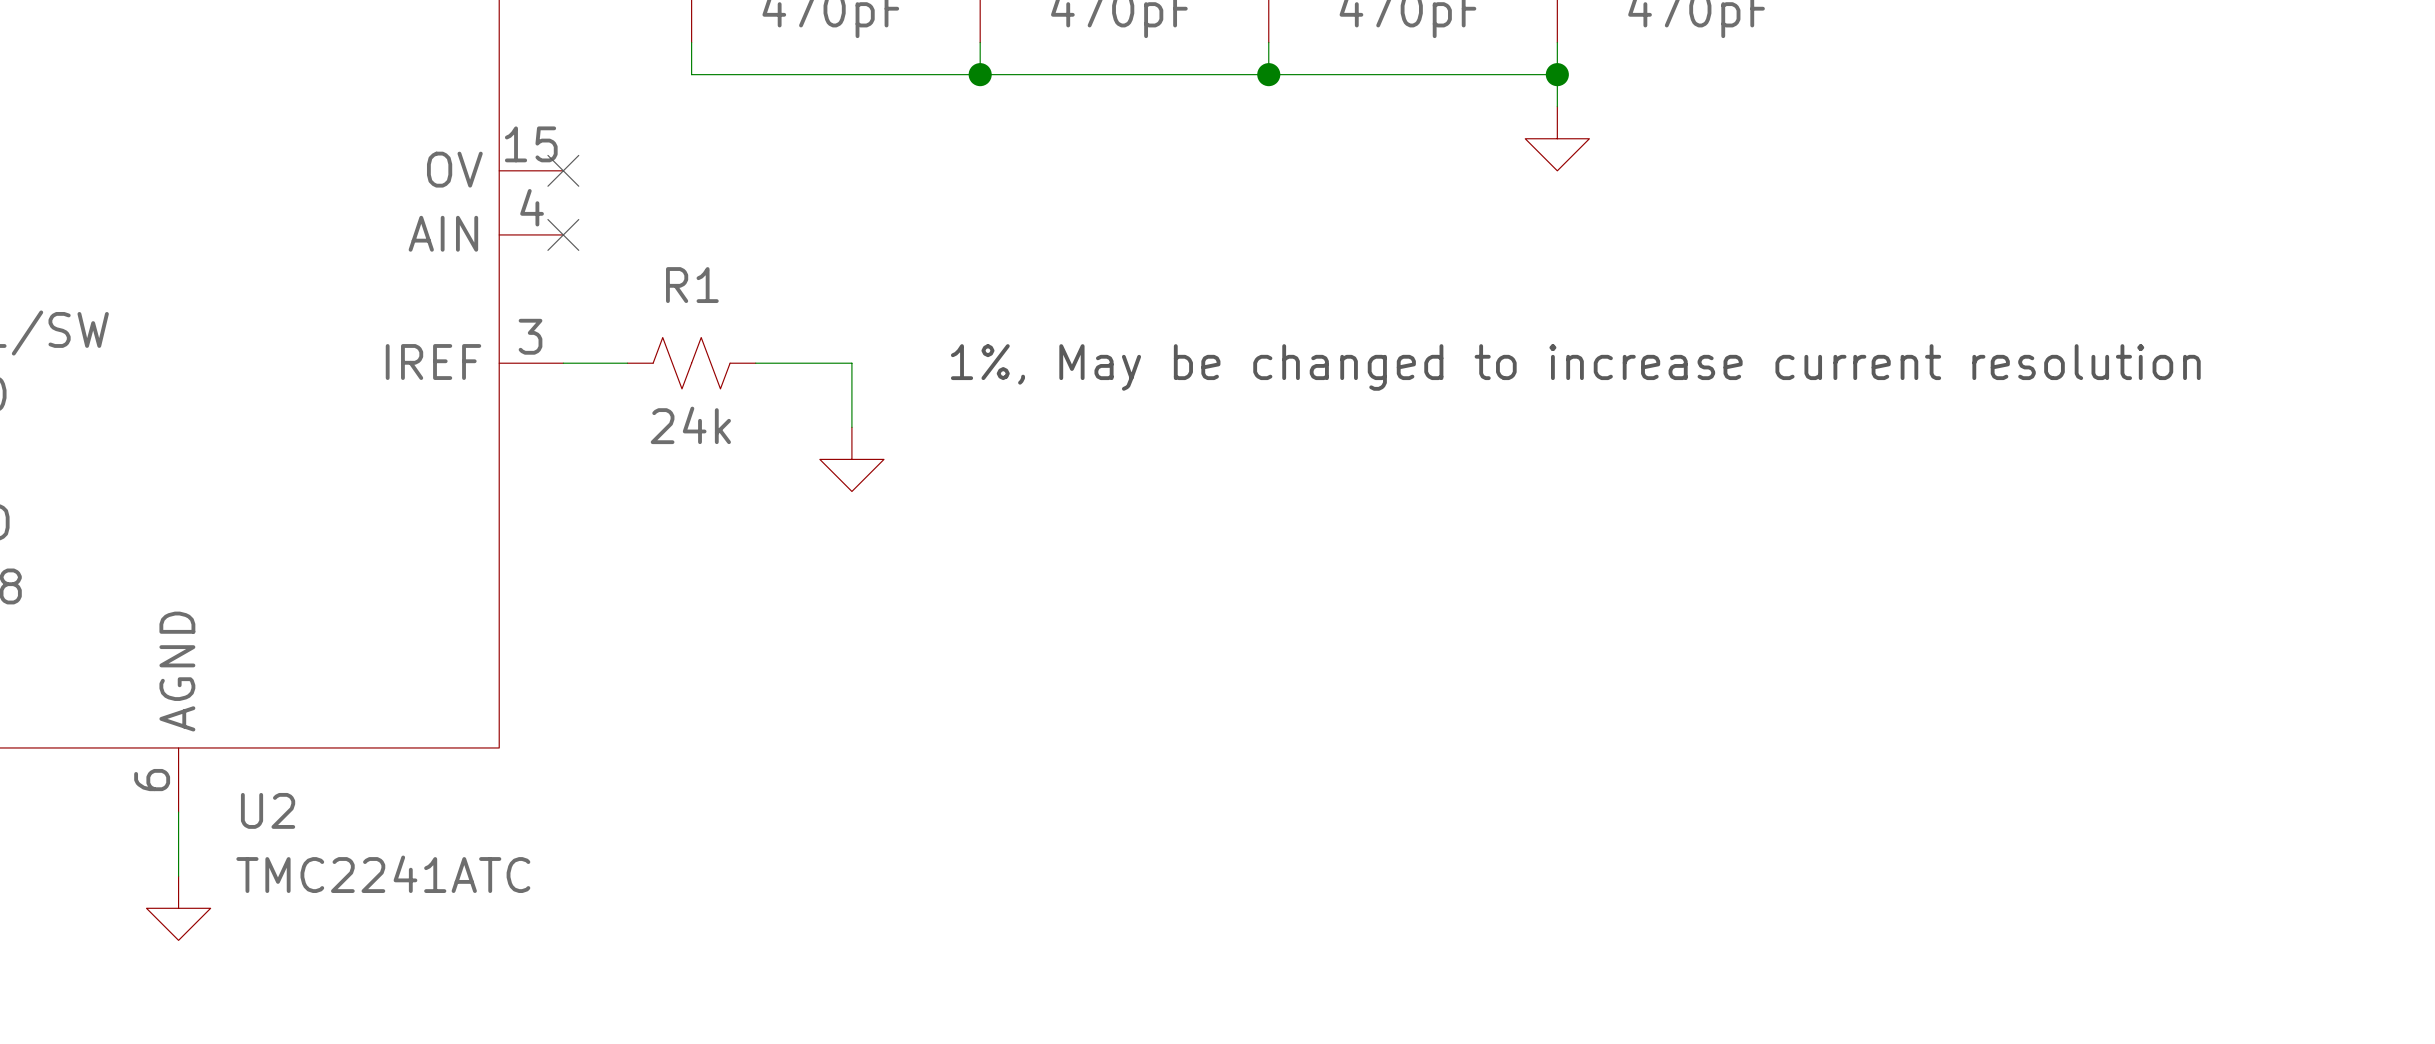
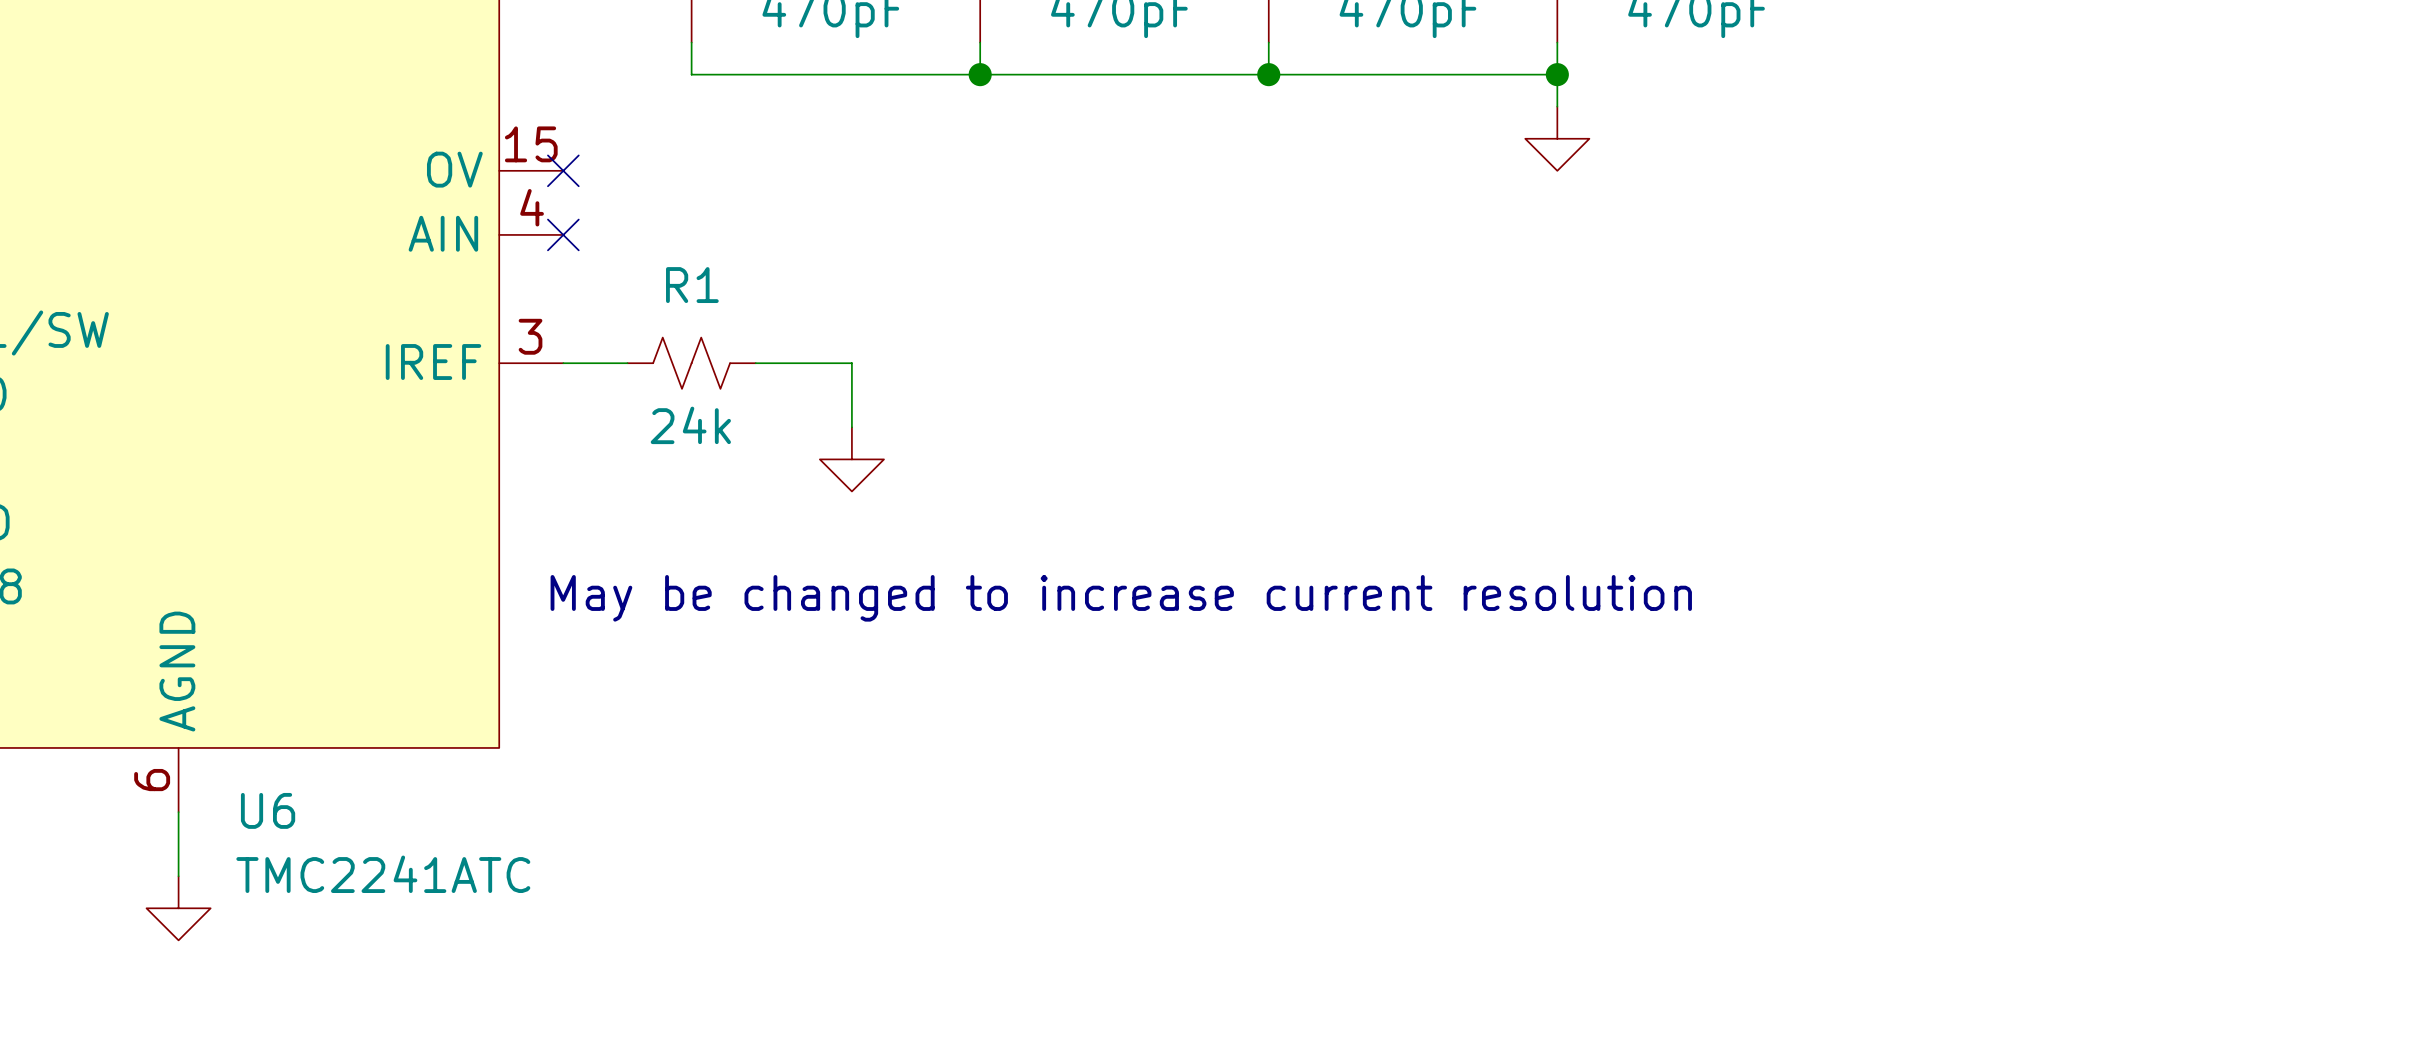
text: 1%, May be changed to increase current resolution (1575, 367) -> none
text: none -> May be changed to increase current resolution (1121, 598)
U2 name: U2 (268, 810) -> U6 (268, 810)

